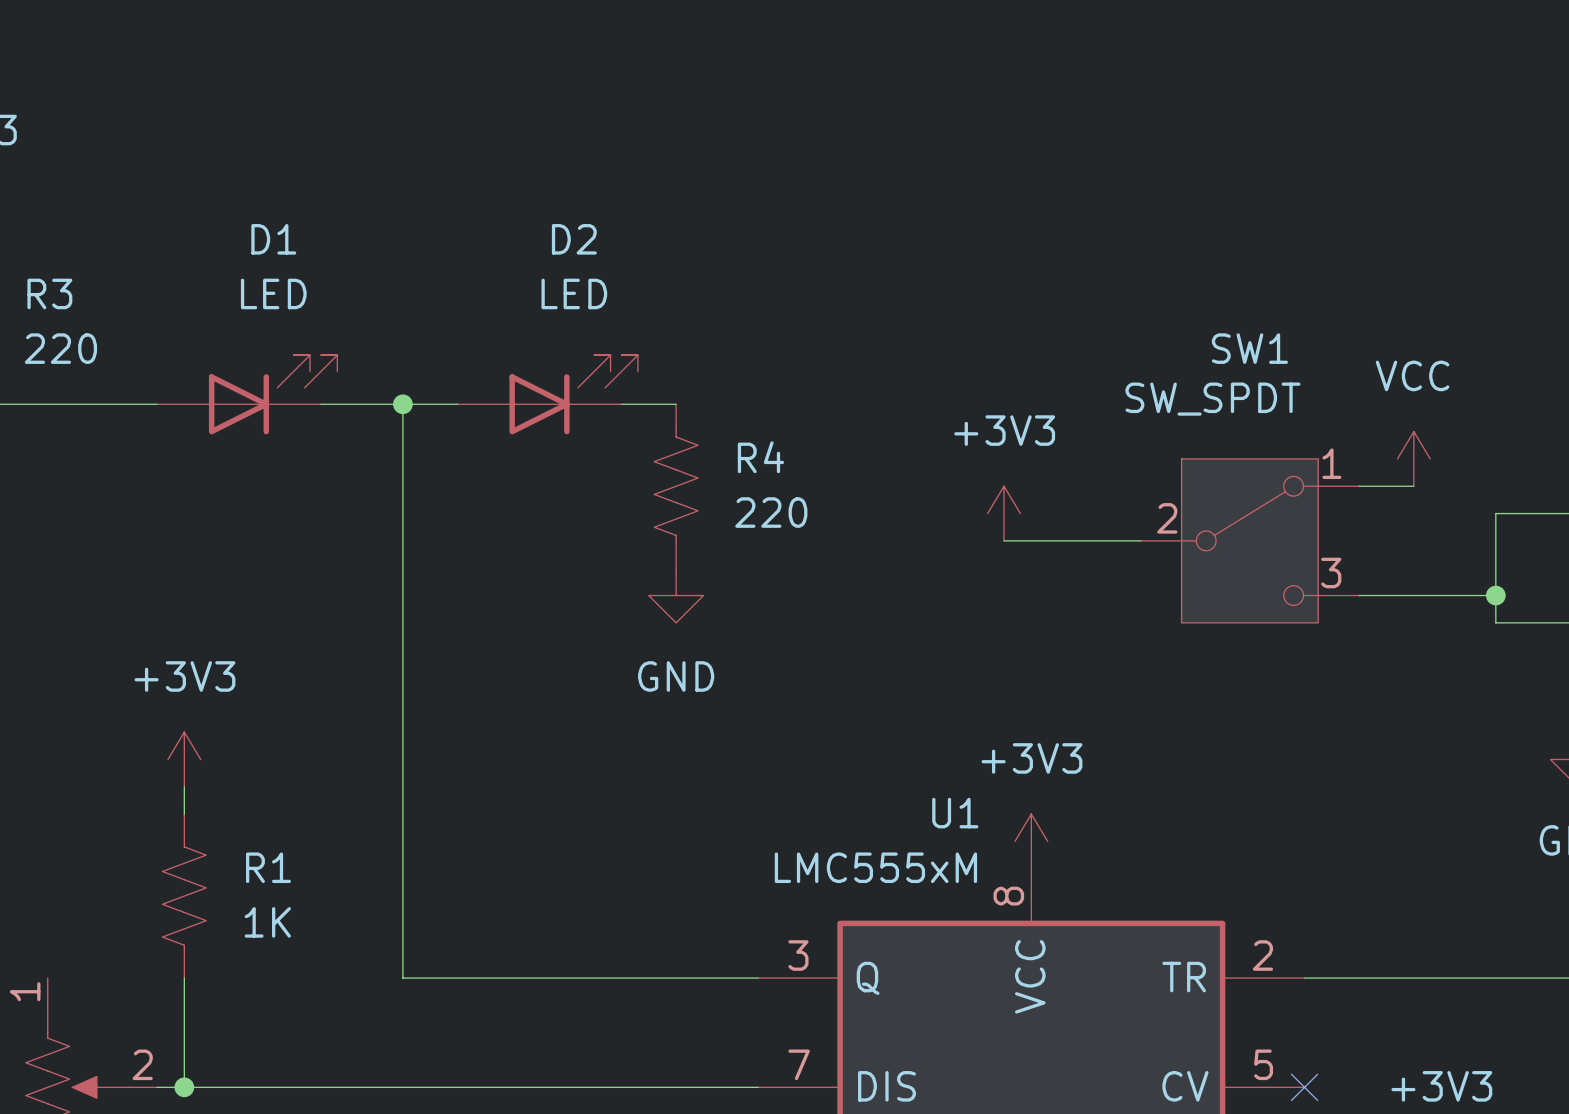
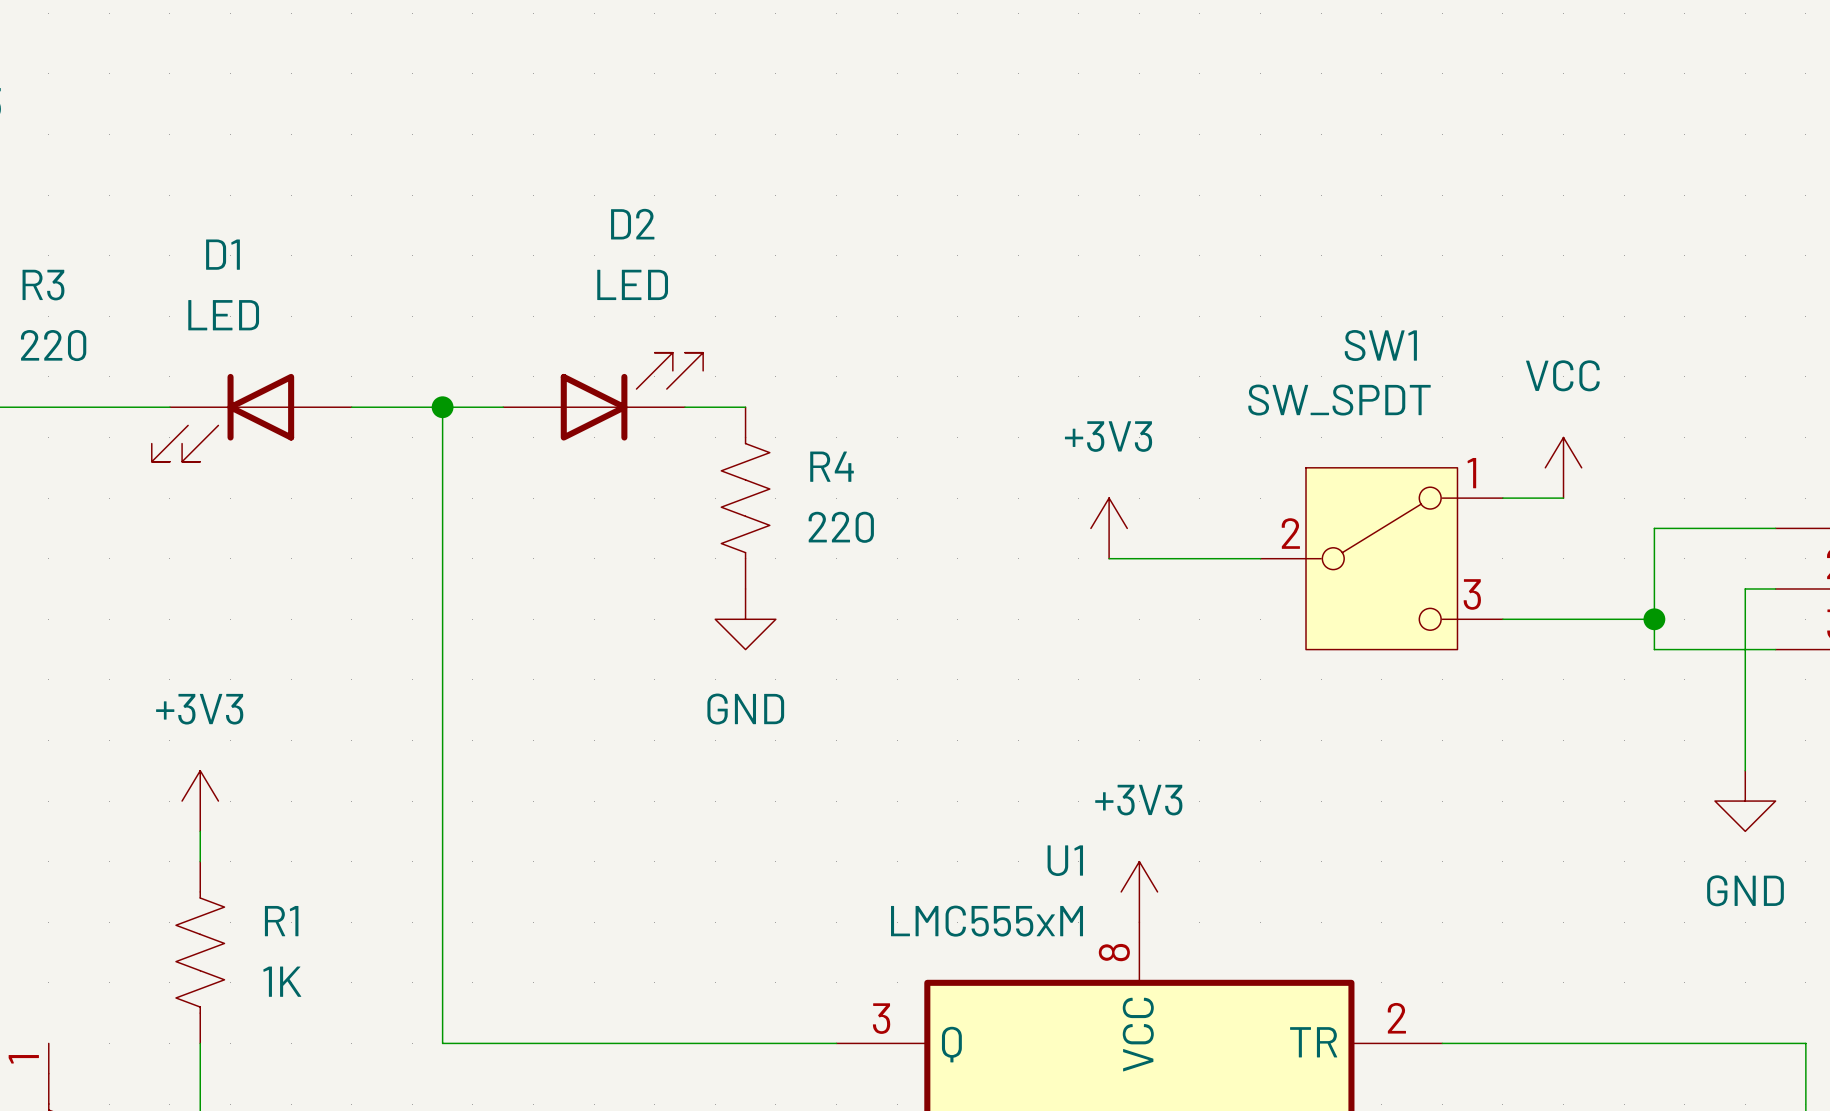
D1 name position: D1 (273, 239) -> D1 (222, 254)
D1 value position: LED (273, 293) -> LED (223, 315)
D1 rotation: 0° (273, 394) -> 180° (222, 417)

